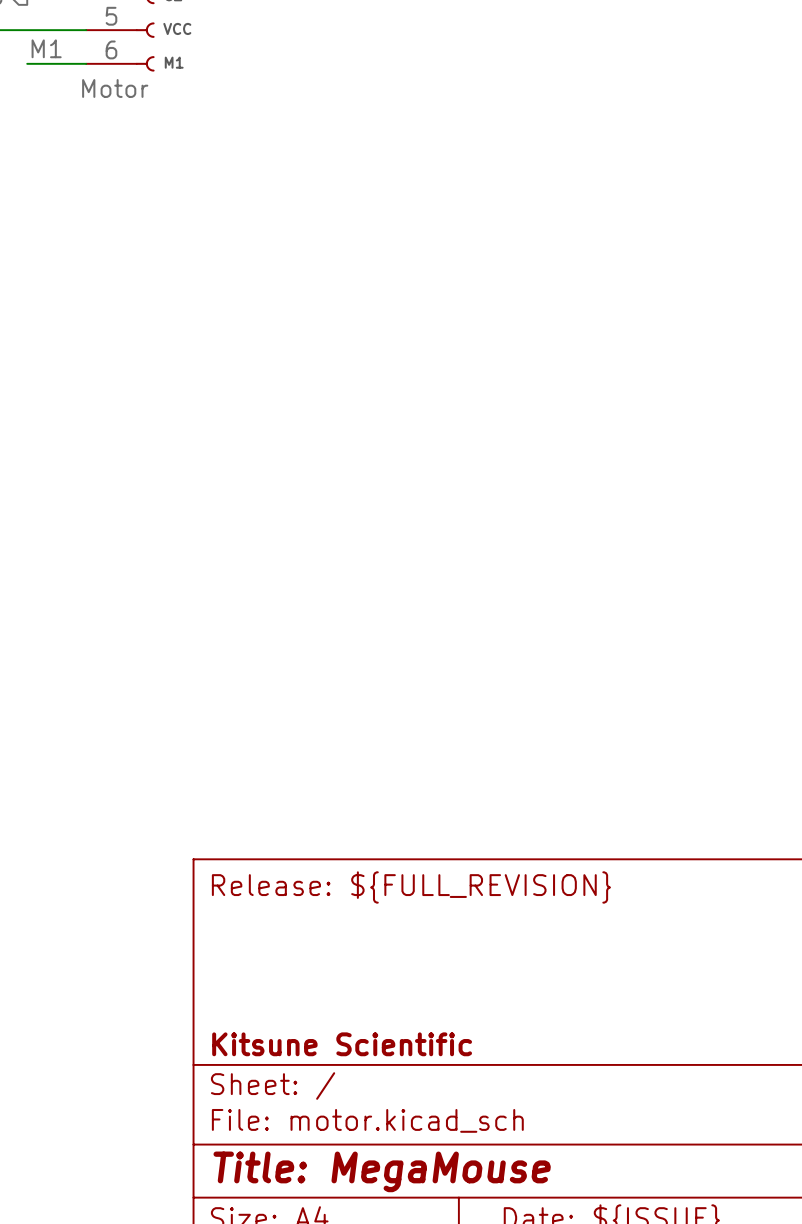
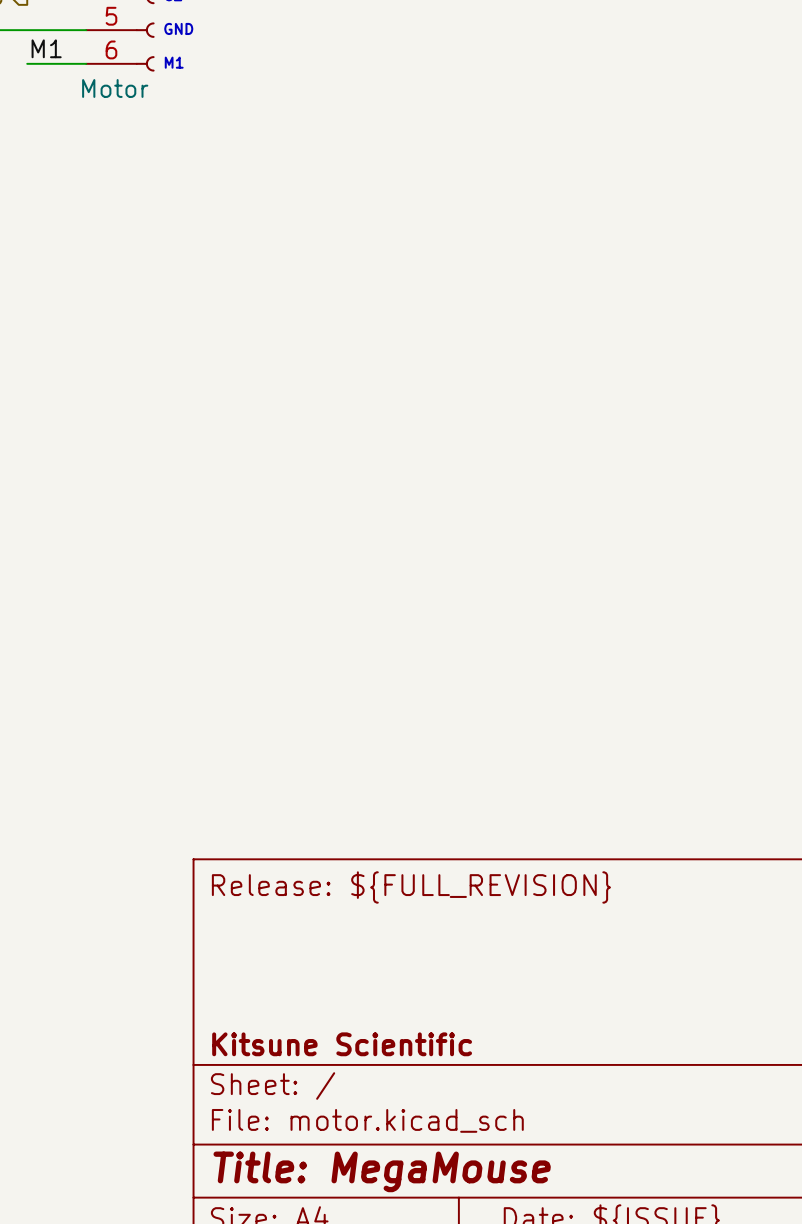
text: VCC (177, 28) -> GND (178, 28)

